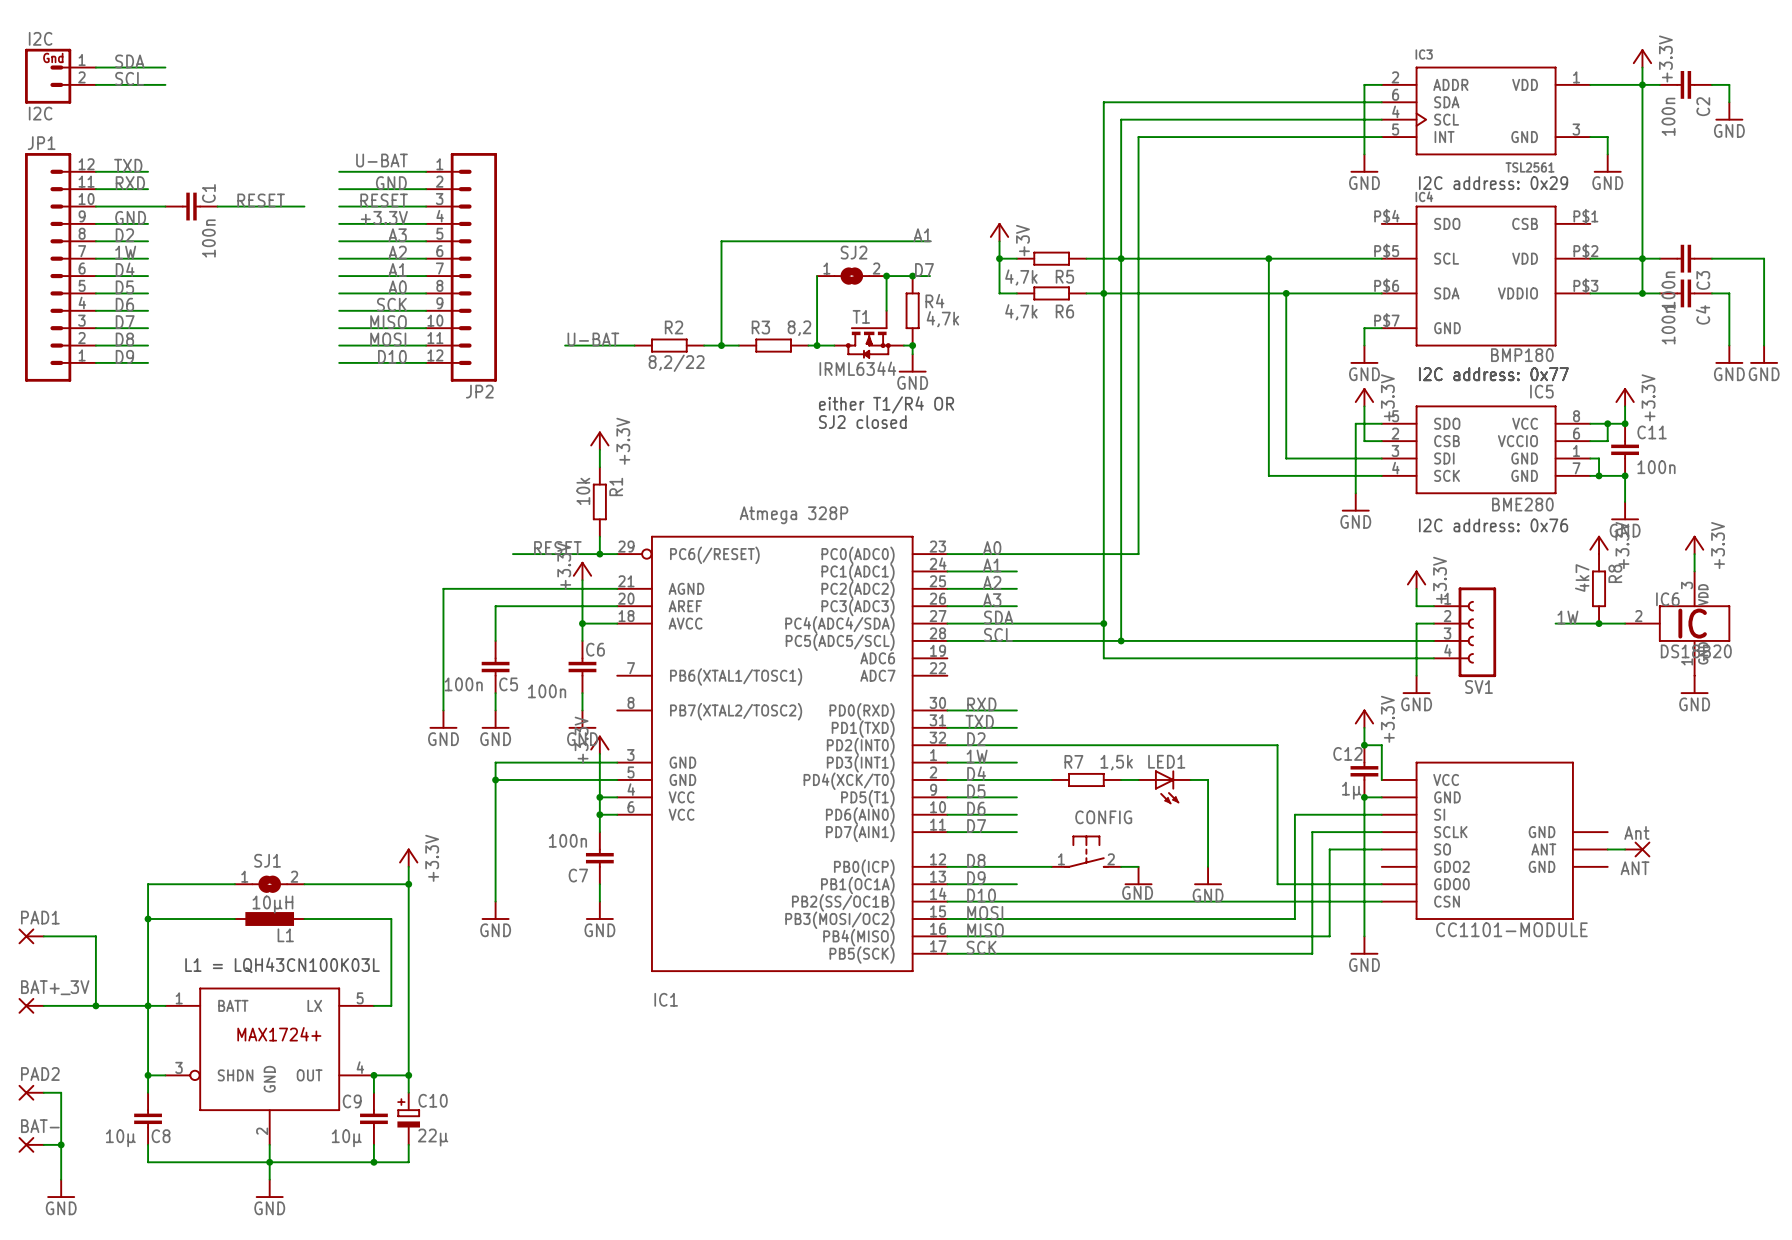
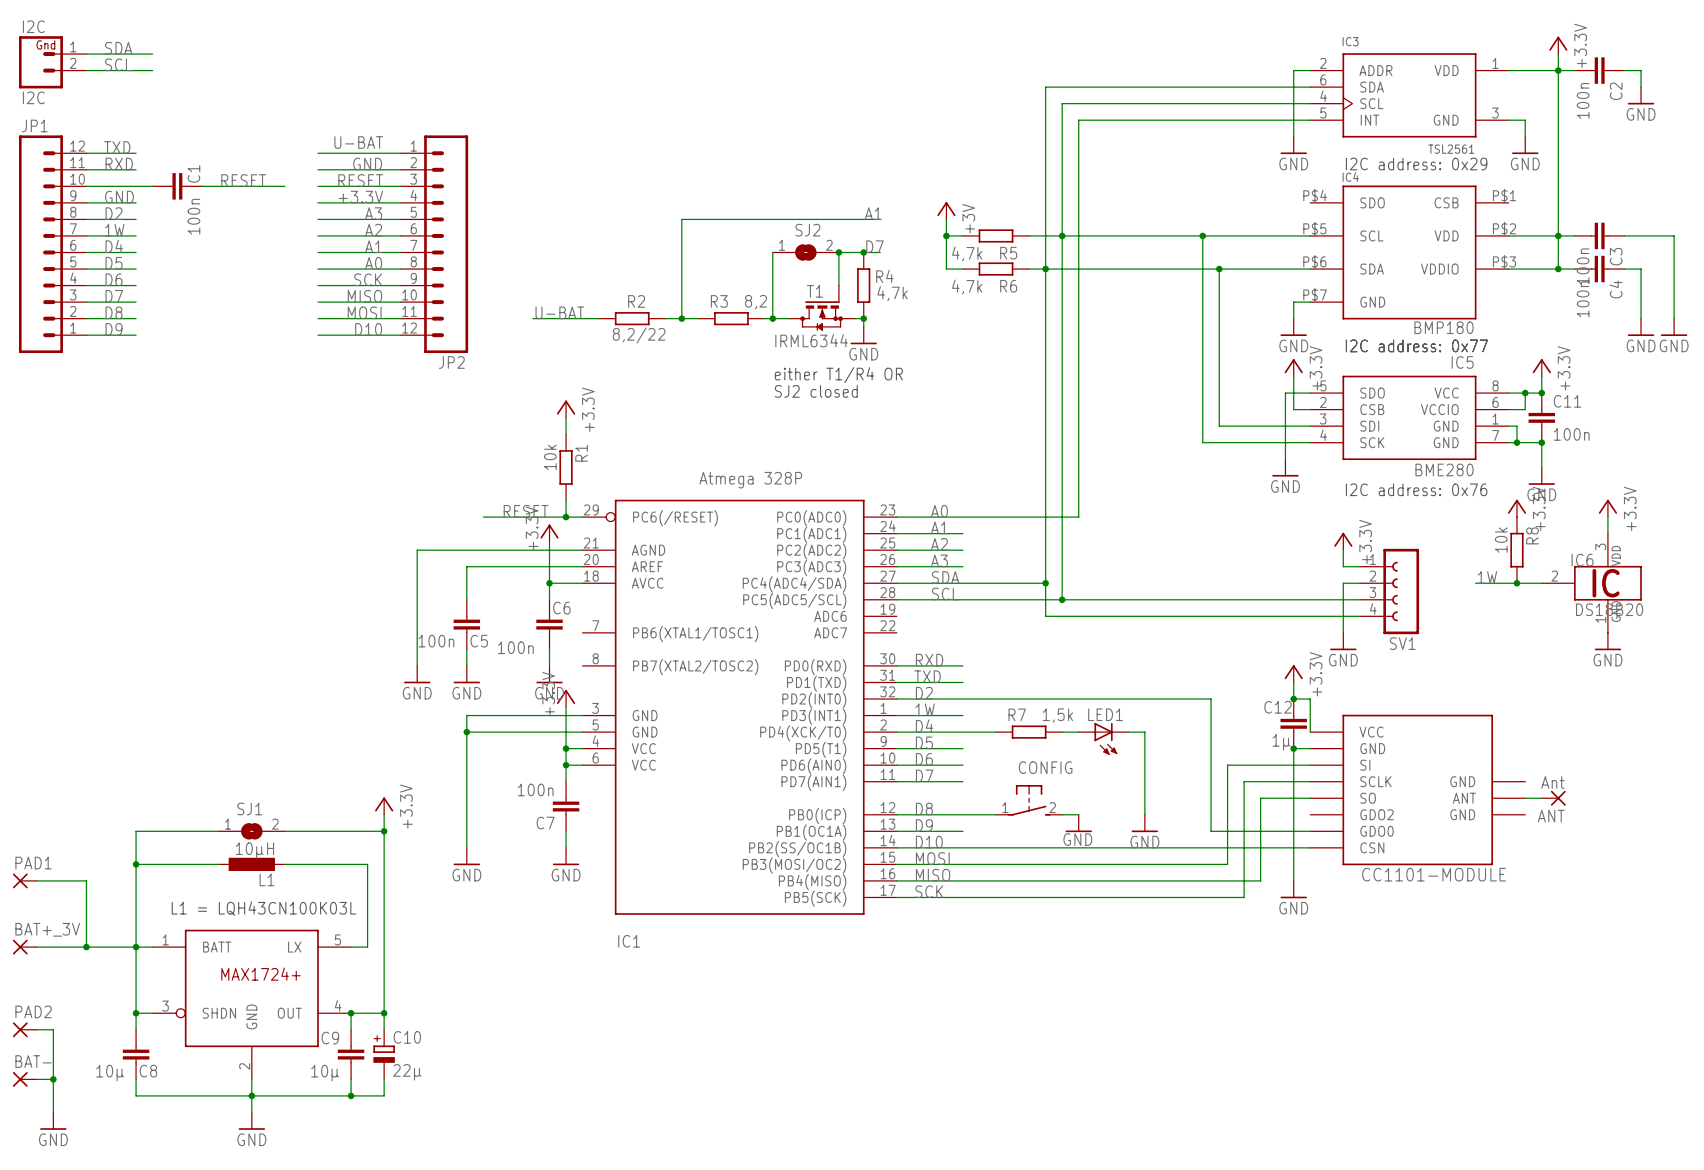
R8 value: 4k7 (1582, 578) -> 10k (1501, 540)

